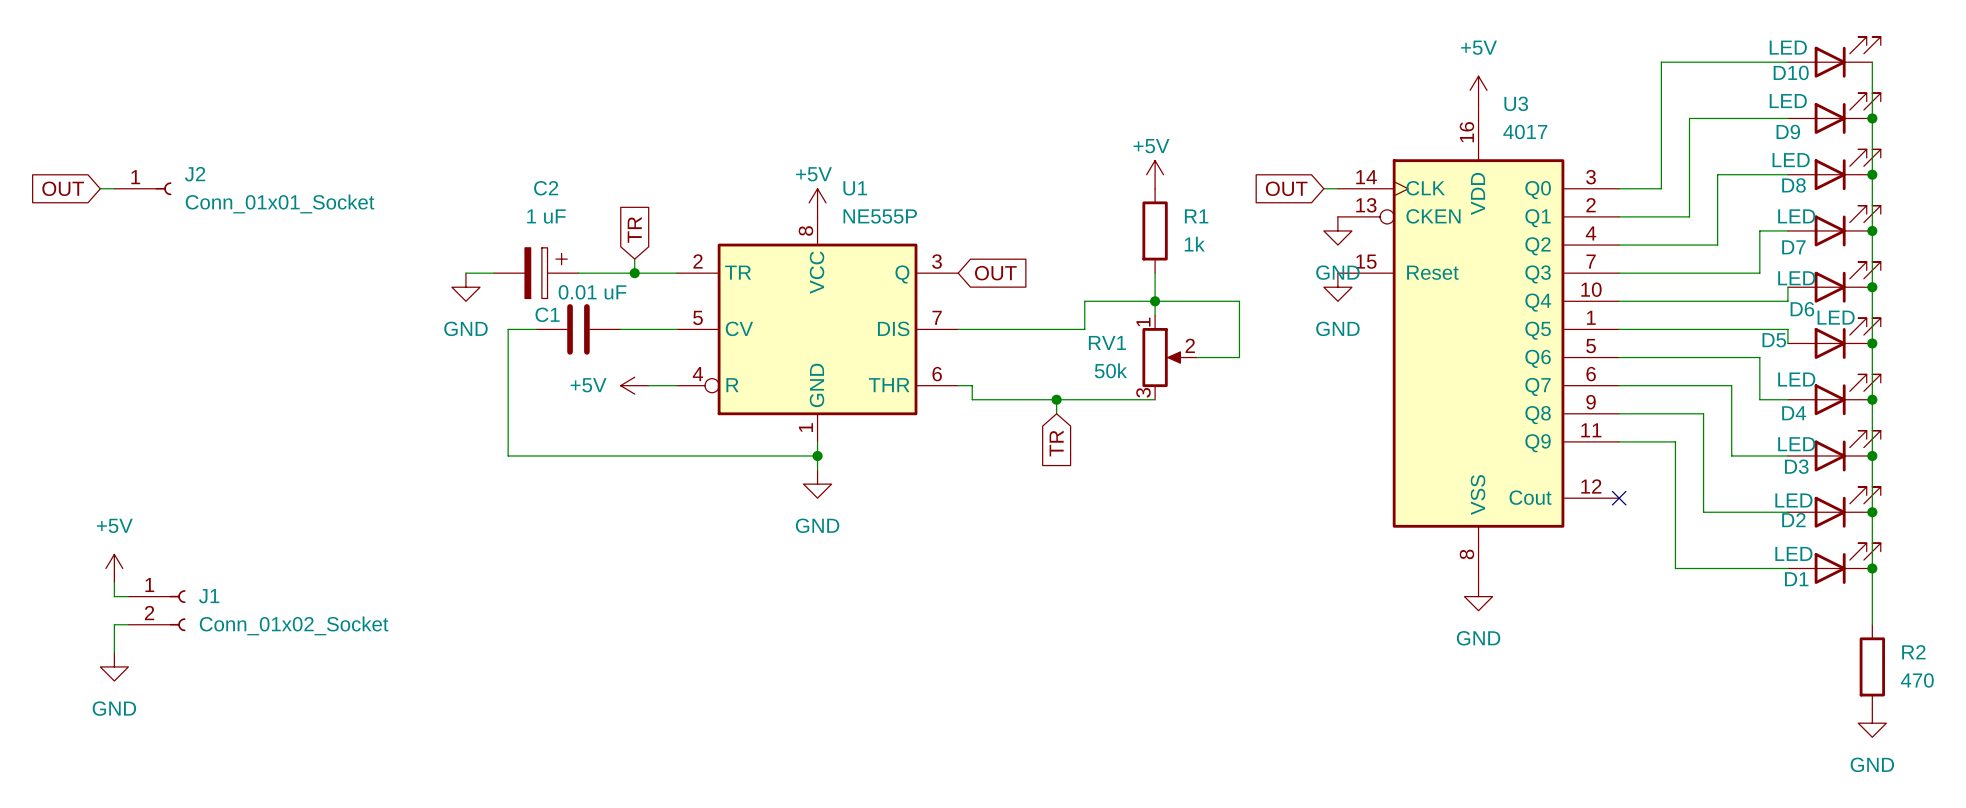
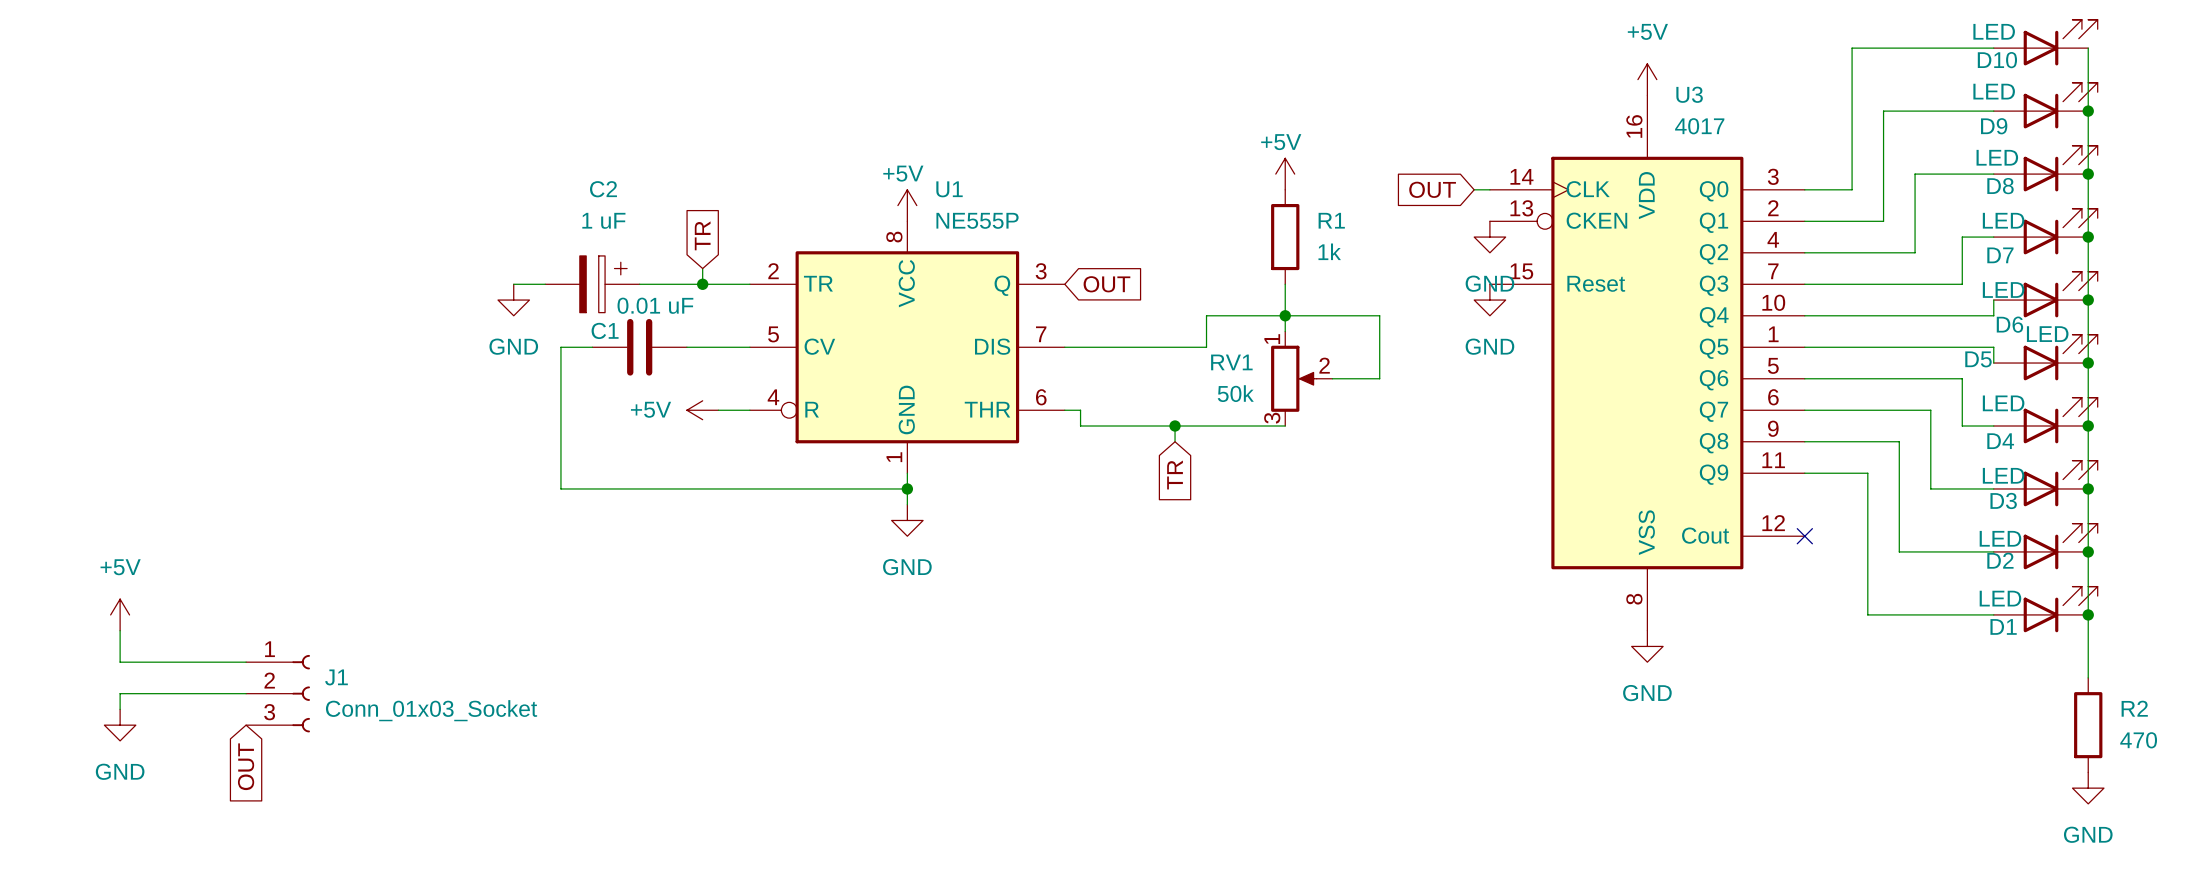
global label: OUT (63, 188) -> none
wire: (100, 188) (114, 188) -> none
J2: Conn_01x01_Socket (142, 188) -> none
J1 symbol: [128, 590, 186, 632] -> [246, 654, 310, 733]
wire: (114, 596) (128, 596) -> (120, 646) (120, 662) (246, 662)
wire: (128, 624) (114, 624) (114, 638) -> (246, 693) (120, 693)
J1 value: Conn_01x02_Socket (294, 625) -> Conn_01x03_Socket (431, 710)
global label: none -> OUT (246, 766)

